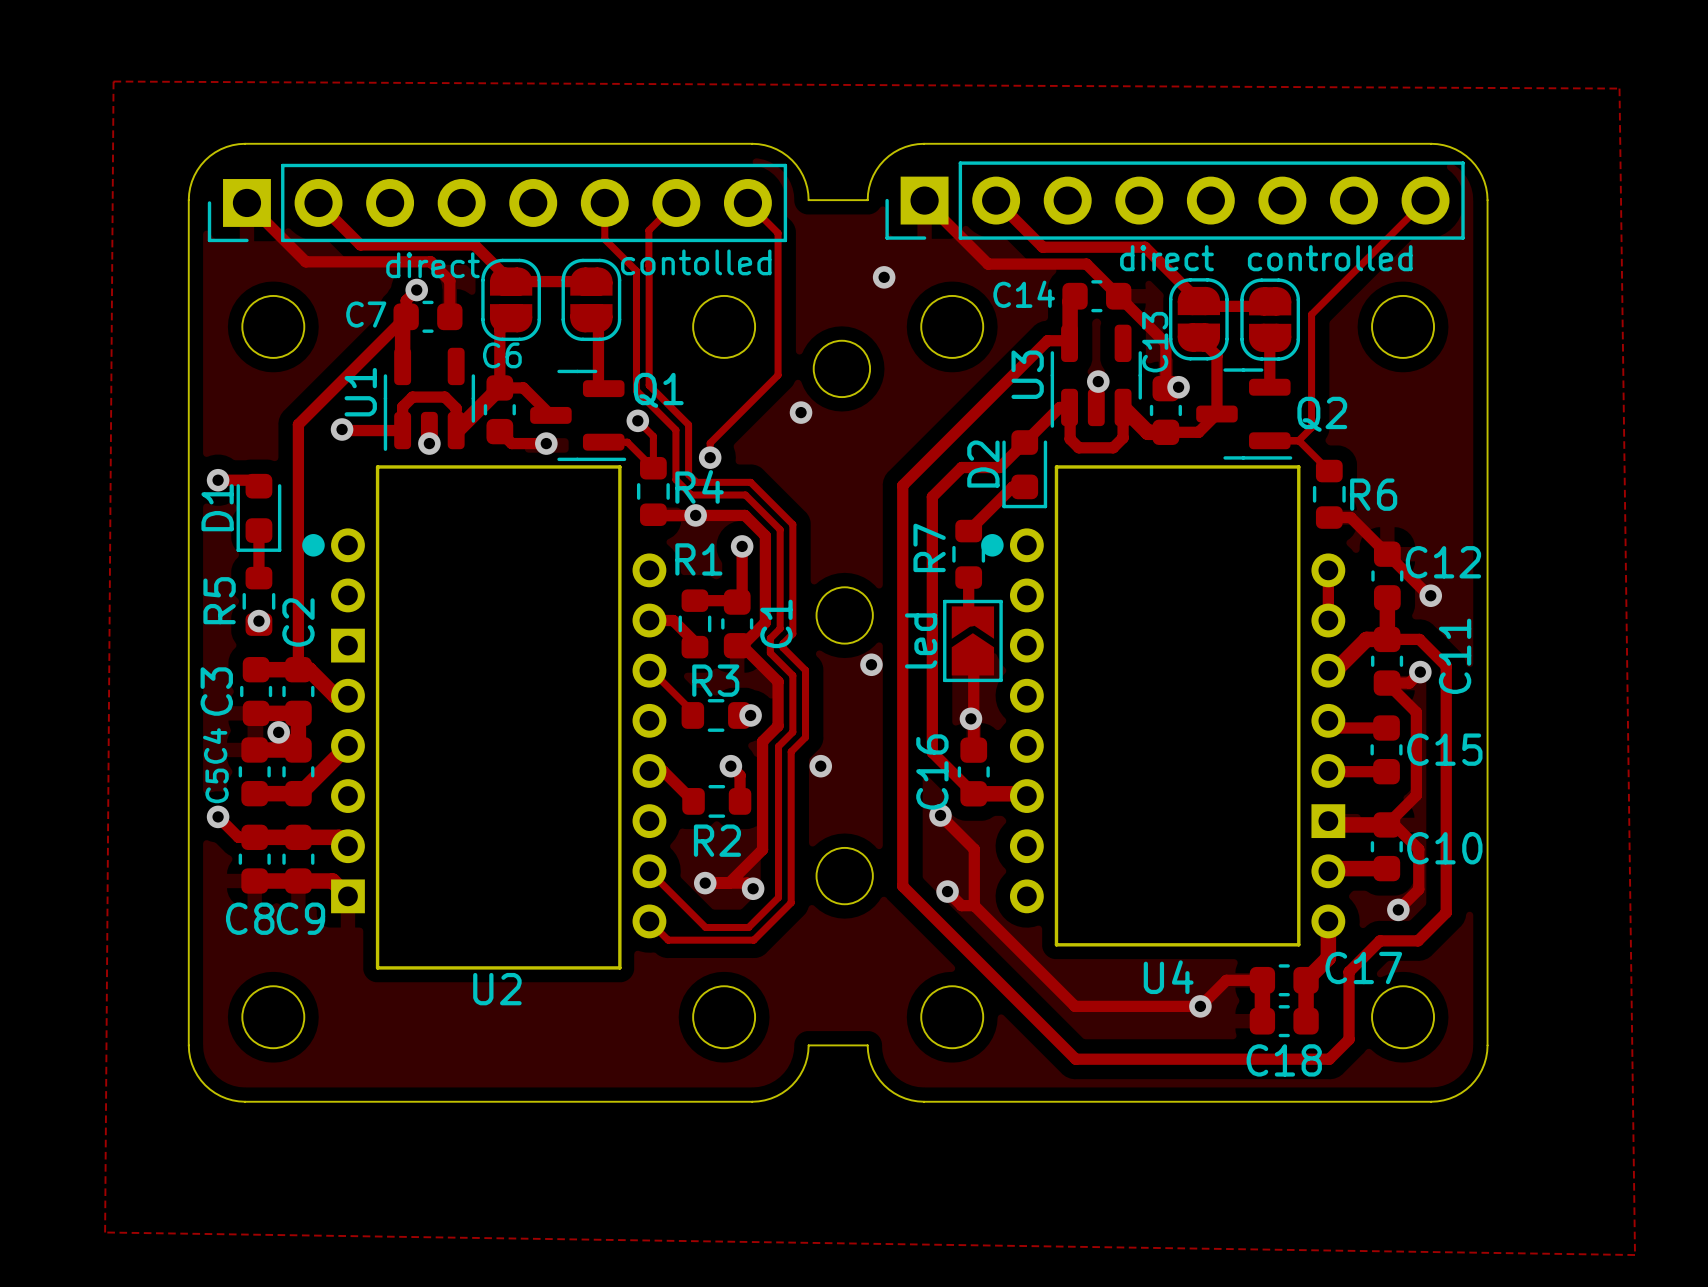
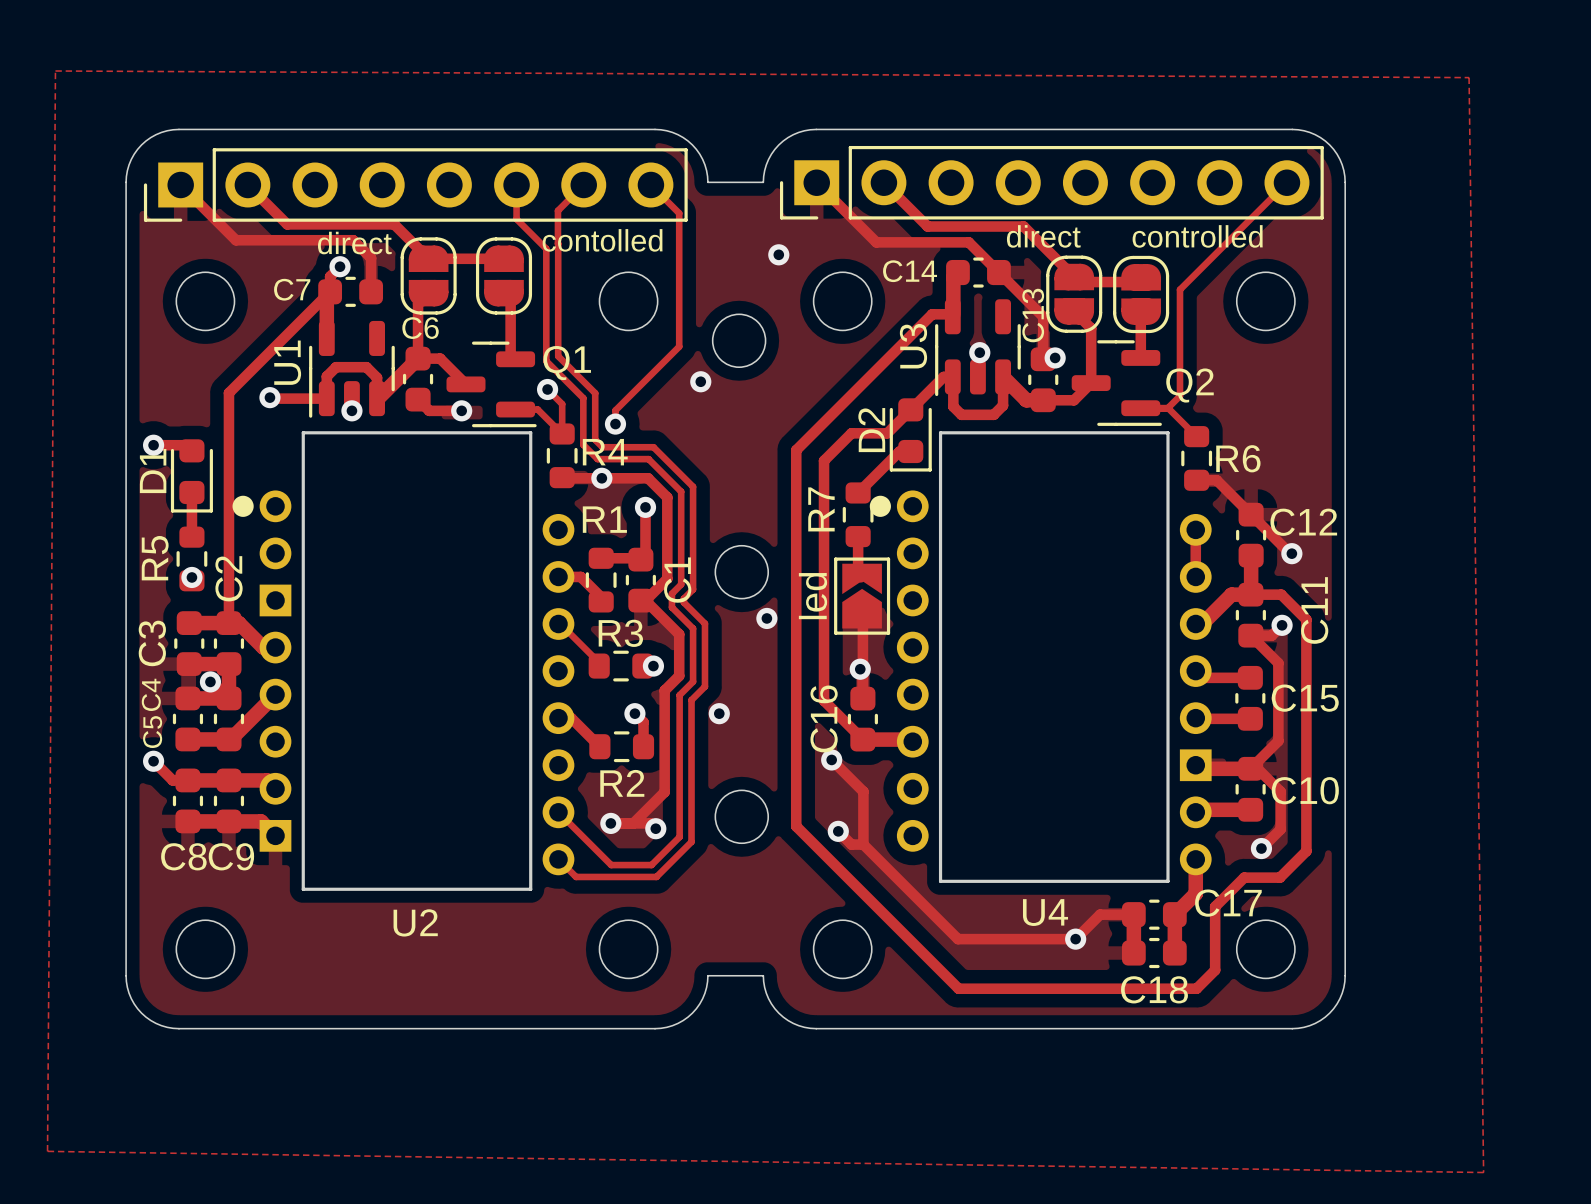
U2 footprint: [302, 465, 667, 970] -> [232, 431, 575, 891]

